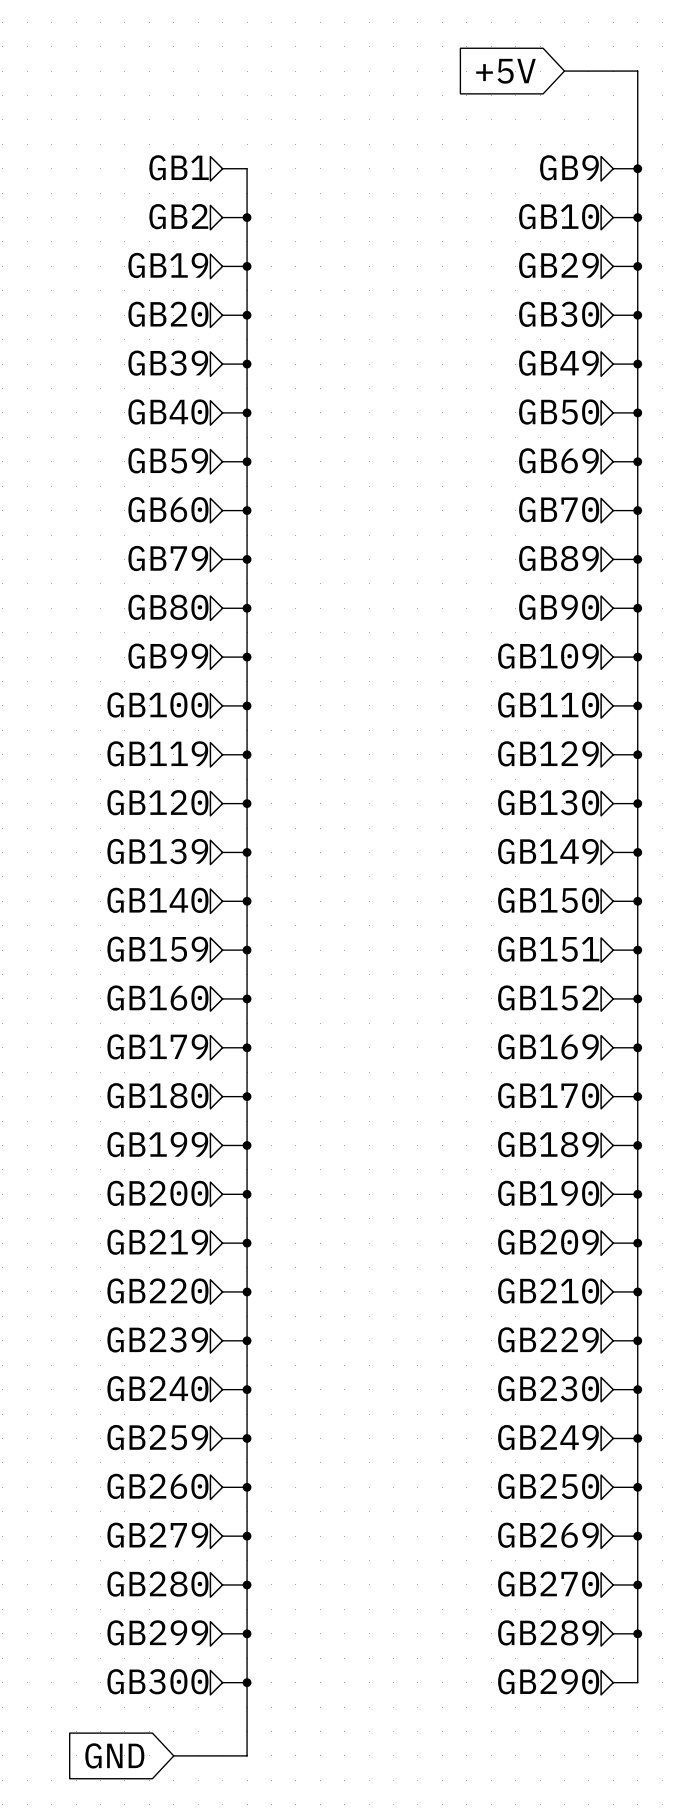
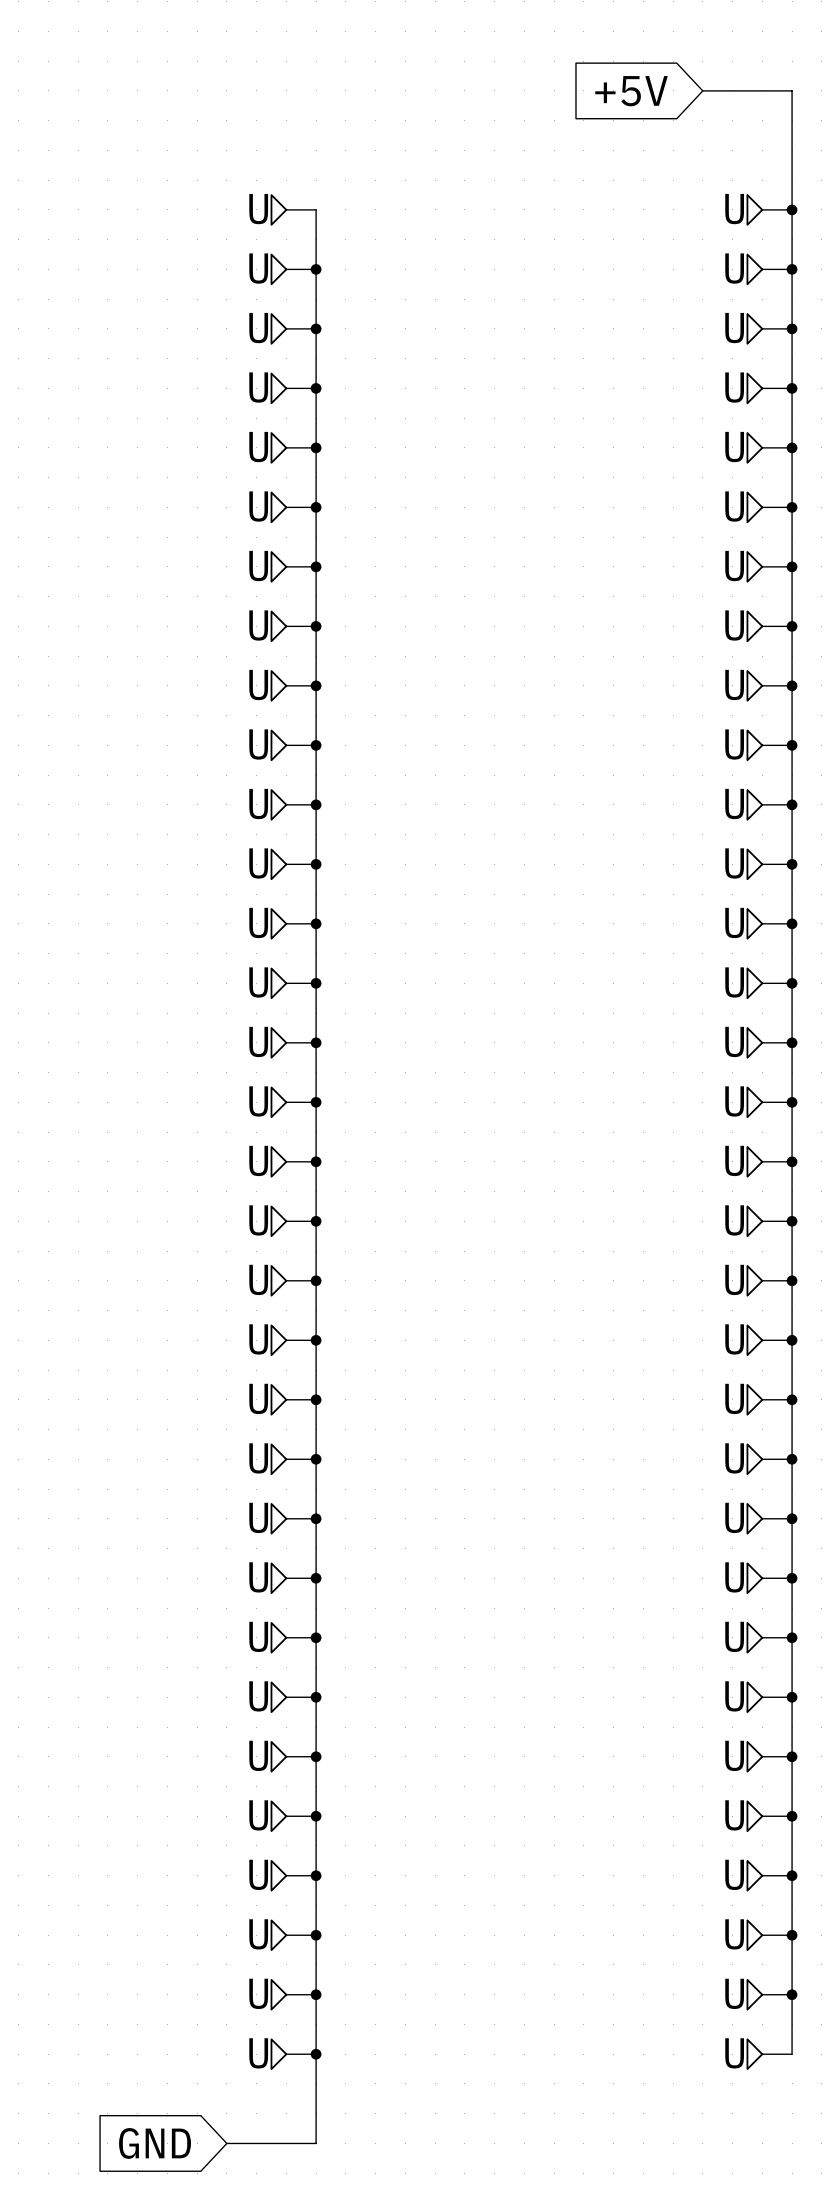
GB1 name: GB1 (179, 167) -> U (258, 209)
GB9 name: GB9 (569, 167) -> U (734, 209)
GB2 name: GB2 (178, 216) -> U (258, 268)
GB10 name: GB10 (559, 216) -> U (734, 268)
GB19 name: GB19 (168, 265) -> U (258, 328)
GB29 name: GB29 (558, 265) -> U (734, 328)
GB20 name: GB20 (168, 314) -> U (258, 387)
GB30 name: GB30 (559, 314) -> U (734, 387)
GB39 name: GB39 (168, 363) -> U (258, 447)
GB49 name: GB49 (558, 363) -> U (734, 447)
GB40 name: GB40 (168, 412) -> U (258, 506)
GB50 name: GB50 (559, 412) -> U (734, 506)
GB59 name: GB59 (168, 460) -> U (258, 566)
GB69 name: GB69 (558, 460) -> U (734, 566)
GB60 name: GB60 (168, 509) -> U (258, 625)
GB70 name: GB70 (559, 509) -> U (734, 625)
GB79 name: GB79 (168, 558) -> U (258, 685)
GB89 name: GB89 (558, 558) -> U (734, 685)
GB80 name: GB80 (168, 607) -> U (258, 744)
GB90 name: GB90 (559, 607) -> U (734, 744)
GB99 name: GB99 (168, 656) -> U (258, 803)
GB109 name: GB109 (548, 656) -> U (734, 803)
GB100 name: GB100 (157, 705) -> U (258, 863)
GB110 name: GB110 (548, 705) -> U (734, 863)
GB119 name: GB119 (157, 753) -> U (258, 922)
GB129 name: GB129 (548, 753) -> U (734, 922)
GB120 name: GB120 (157, 802) -> U (258, 982)
GB130 name: GB130 (548, 802) -> U (734, 982)
GB139 name: GB139 (157, 851) -> U (258, 1041)
GB149 name: GB149 (548, 851) -> U (734, 1041)
GB140 name: GB140 (157, 900) -> U (258, 1101)
GB150 name: GB150 (548, 900) -> U (734, 1101)
GB159 name: GB159 (157, 949) -> U (258, 1160)
GB151 name: GB151 (548, 949) -> U (734, 1160)
GB160 name: GB160 (157, 998) -> U (258, 1220)
GB152 name: GB152 (548, 998) -> U (734, 1220)
GB179 name: GB179 (157, 1046) -> U (258, 1279)
GB169 name: GB169 (548, 1046) -> U (734, 1279)
GB180 name: GB180 (157, 1095) -> U (258, 1339)
GB170 name: GB170 (548, 1095) -> U (734, 1339)
GB199 name: GB199 (157, 1144) -> U (258, 1398)
GB189 name: GB189 (548, 1144) -> U (734, 1398)
GB200 name: GB200 (157, 1193) -> U (258, 1458)
GB190 name: GB190 (548, 1193) -> U (734, 1458)
GB219 name: GB219 (157, 1242) -> U (258, 1517)
GB209 name: GB209 (548, 1242) -> U (734, 1517)
GB220 name: GB220 (157, 1291) -> U (258, 1577)
GB210 name: GB210 (548, 1291) -> U (734, 1577)
GB239 name: GB239 (157, 1339) -> U (258, 1636)
GB229 name: GB229 (548, 1339) -> U (734, 1636)
GB240 name: GB240 (157, 1388) -> U (258, 1696)
GB230 name: GB230 (548, 1388) -> U (734, 1696)
GB259 name: GB259 (157, 1437) -> U (258, 1755)
GB249 name: GB249 (548, 1437) -> U (734, 1755)
GB260 name: GB260 (157, 1486) -> U (258, 1815)
GB250 name: GB250 (548, 1486) -> U (734, 1815)
GB279 name: GB279 (157, 1535) -> U (258, 1874)
GB269 name: GB269 (548, 1535) -> U (734, 1874)
GB280 name: GB280 (157, 1584) -> U (258, 1934)
GB270 name: GB270 (548, 1584) -> U (734, 1934)
GB299 name: GB299 (157, 1632) -> U (258, 1993)
GB289 name: GB289 (548, 1632) -> U (734, 1993)
GB300 name: GB300 (157, 1681) -> U (258, 2053)
GB290 name: GB290 (548, 1681) -> U (734, 2053)

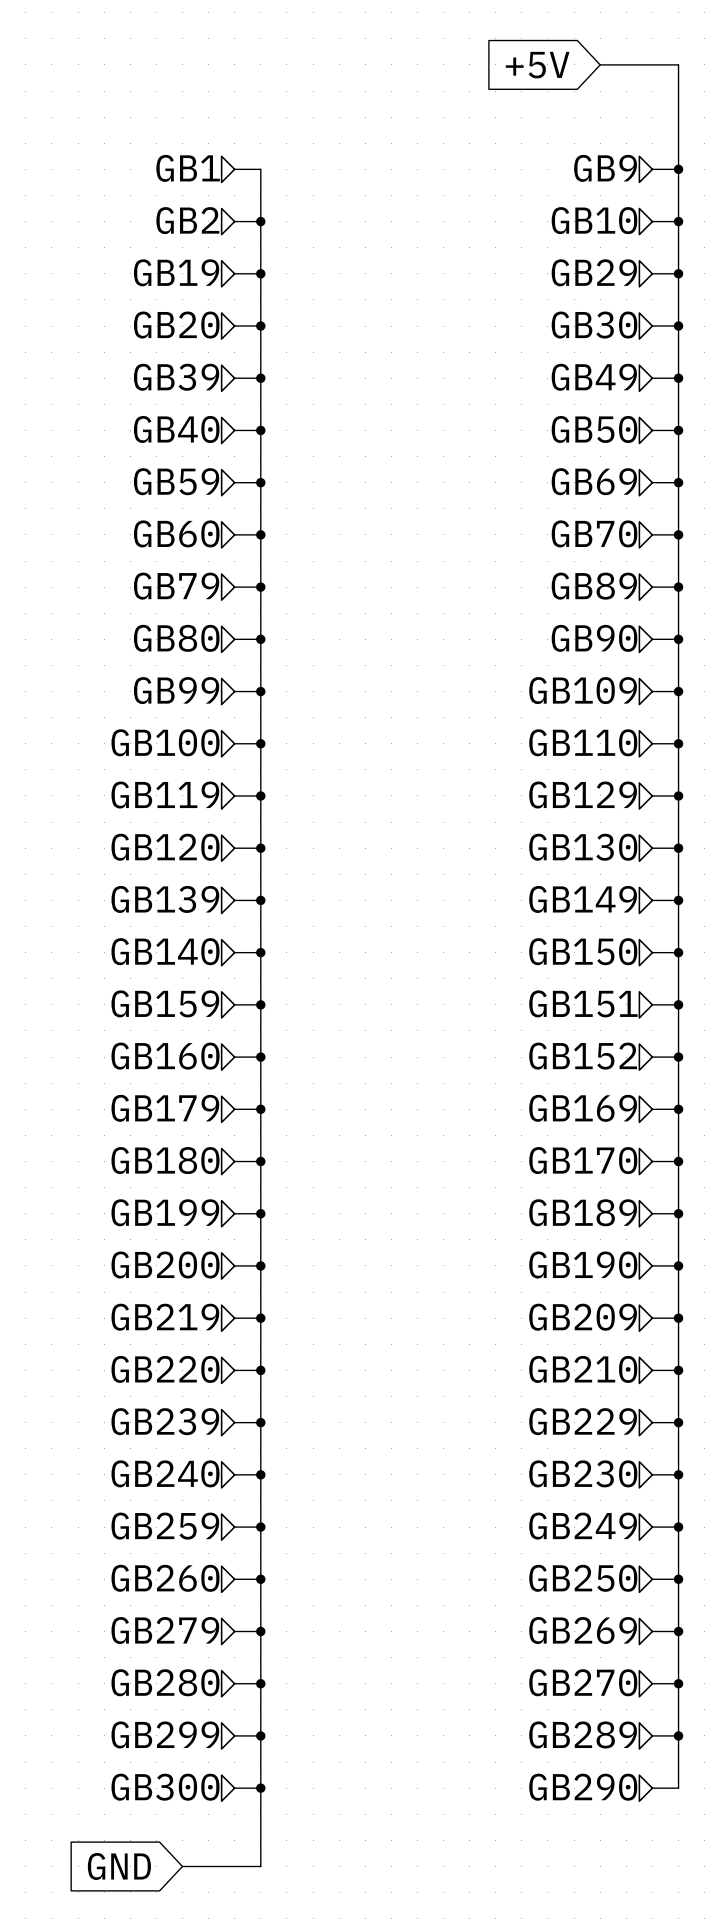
U name: U (258, 209) -> GB1 (188, 168)
U name: U (734, 209) -> GB9 (605, 168)
U name: U (258, 268) -> GB2 (187, 220)
U name: U (734, 268) -> GB10 (594, 220)
U name: U (258, 328) -> GB19 (176, 272)
U name: U (734, 328) -> GB29 (594, 272)
U name: U (258, 387) -> GB20 (176, 325)
U name: U (734, 387) -> GB30 (594, 325)
U name: U (258, 447) -> GB39 (176, 377)
U name: U (734, 447) -> GB49 (594, 377)
U name: U (258, 506) -> GB40 (176, 429)
U name: U (734, 506) -> GB50 (594, 429)
U name: U (258, 566) -> GB59 (176, 481)
U name: U (734, 566) -> GB69 (594, 481)
U name: U (258, 625) -> GB60 (176, 533)
U name: U (734, 625) -> GB70 (594, 533)
U name: U (258, 685) -> GB79 (176, 586)
U name: U (734, 685) -> GB89 (594, 586)
U name: U (258, 744) -> GB80 (176, 638)
U name: U (734, 744) -> GB90 (594, 638)
U name: U (258, 803) -> GB99 (176, 690)
U name: U (734, 803) -> GB109 (583, 690)
U name: U (258, 863) -> GB100 (165, 742)
U name: U (734, 863) -> GB110 (583, 742)
U name: U (258, 922) -> GB119 (165, 795)
U name: U (734, 922) -> GB129 (583, 795)
U name: U (258, 982) -> GB120 (165, 847)
U name: U (734, 982) -> GB130 (583, 847)
U name: U (258, 1041) -> GB139 (165, 899)
U name: U (734, 1041) -> GB149 (583, 899)
U name: U (258, 1101) -> GB140 (165, 951)
U name: U (734, 1101) -> GB150 (583, 951)
U name: U (258, 1160) -> GB159 (165, 1003)
U name: U (734, 1160) -> GB151 (583, 1003)
U name: U (258, 1220) -> GB160 (165, 1056)
U name: U (734, 1220) -> GB152 (583, 1056)
U name: U (258, 1279) -> GB179 (165, 1108)
U name: U (734, 1279) -> GB169 (583, 1108)
U name: U (258, 1339) -> GB180 (165, 1160)
U name: U (734, 1339) -> GB170 (583, 1160)
U name: U (258, 1398) -> GB199 (165, 1212)
U name: U (734, 1398) -> GB189 (583, 1212)
U name: U (258, 1458) -> GB200 (165, 1264)
U name: U (734, 1458) -> GB190 (583, 1264)
U name: U (258, 1517) -> GB219 (165, 1317)
U name: U (734, 1517) -> GB209 (583, 1317)
U name: U (258, 1577) -> GB220 (165, 1369)
U name: U (734, 1577) -> GB210 (583, 1369)
U name: U (258, 1636) -> GB239 (165, 1421)
U name: U (734, 1636) -> GB229 (583, 1421)
U name: U (258, 1696) -> GB240 (165, 1473)
U name: U (734, 1696) -> GB230 (583, 1473)
U name: U (258, 1755) -> GB259 (165, 1526)
U name: U (734, 1755) -> GB249 (583, 1526)
U name: U (258, 1815) -> GB260 (165, 1578)
U name: U (734, 1815) -> GB250 (583, 1578)
U name: U (258, 1874) -> GB279 (165, 1630)
U name: U (734, 1874) -> GB269 (583, 1630)
U name: U (258, 1934) -> GB280 (165, 1682)
U name: U (734, 1934) -> GB270 (583, 1682)
U name: U (258, 1993) -> GB299 (165, 1734)
U name: U (734, 1993) -> GB289 (583, 1734)
U name: U (258, 2053) -> GB300 (165, 1787)
U name: U (734, 2053) -> GB290 (583, 1787)

